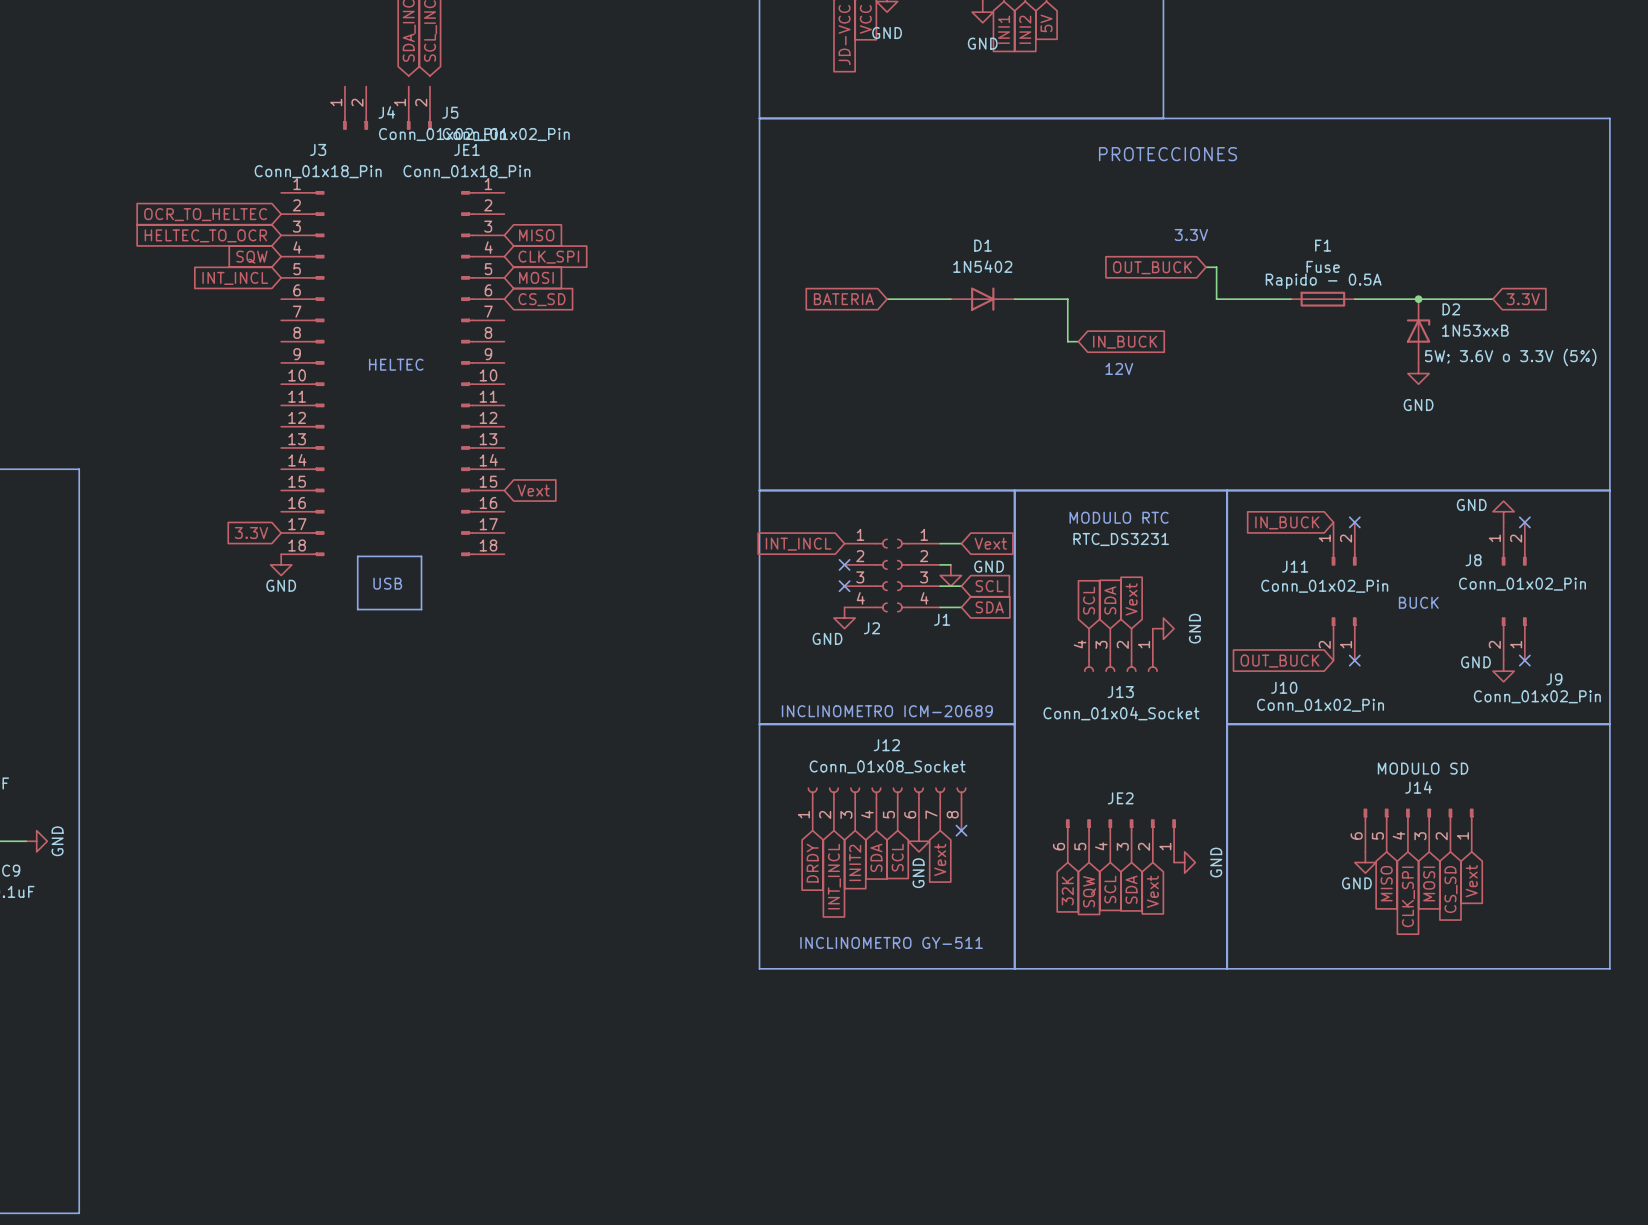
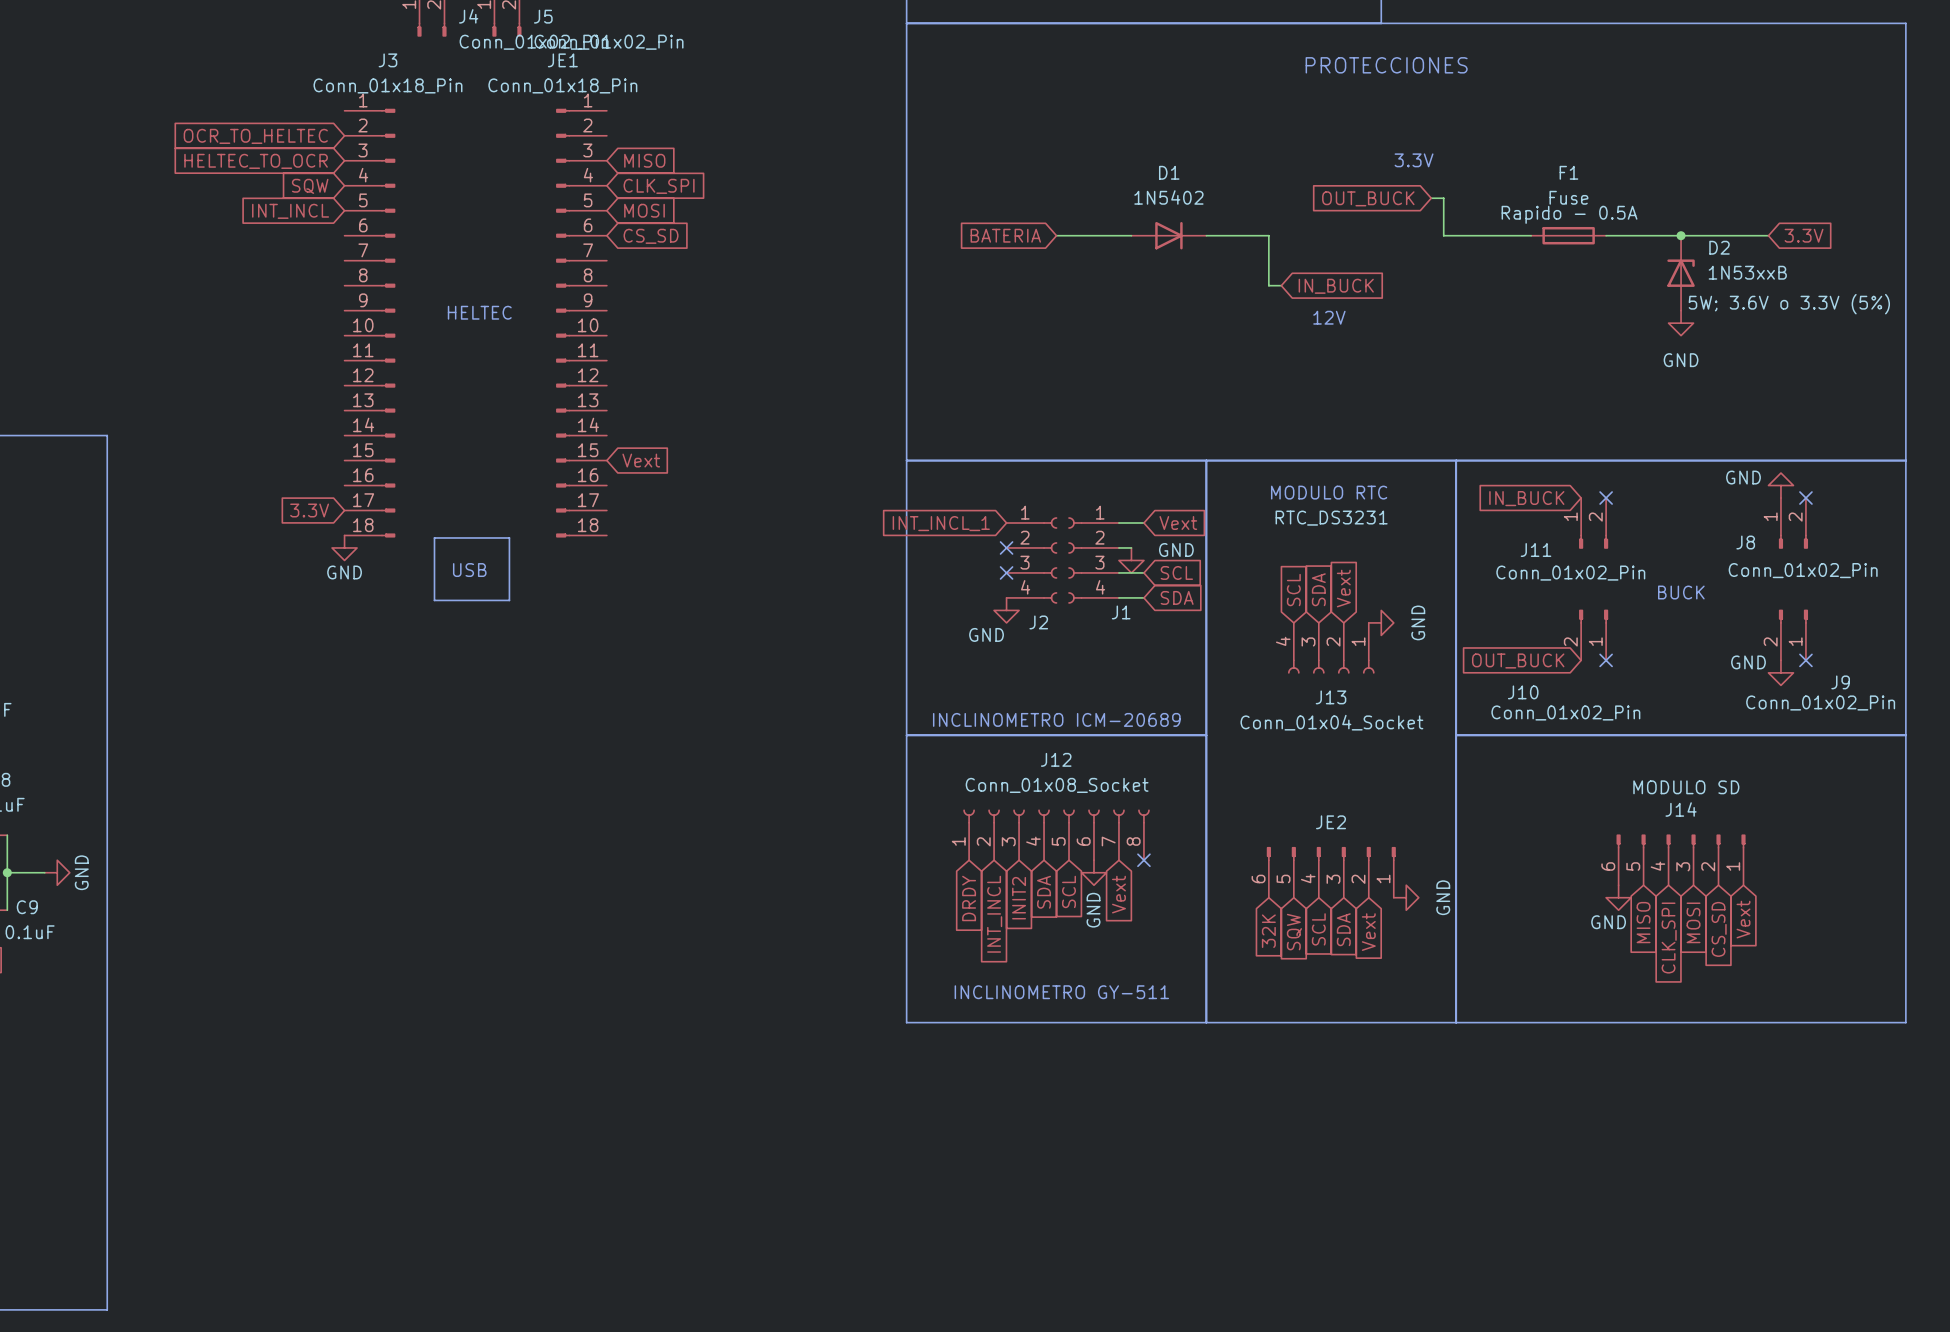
global label: INT_INCL (798, 544) -> INT_INCL_1 (941, 523)

